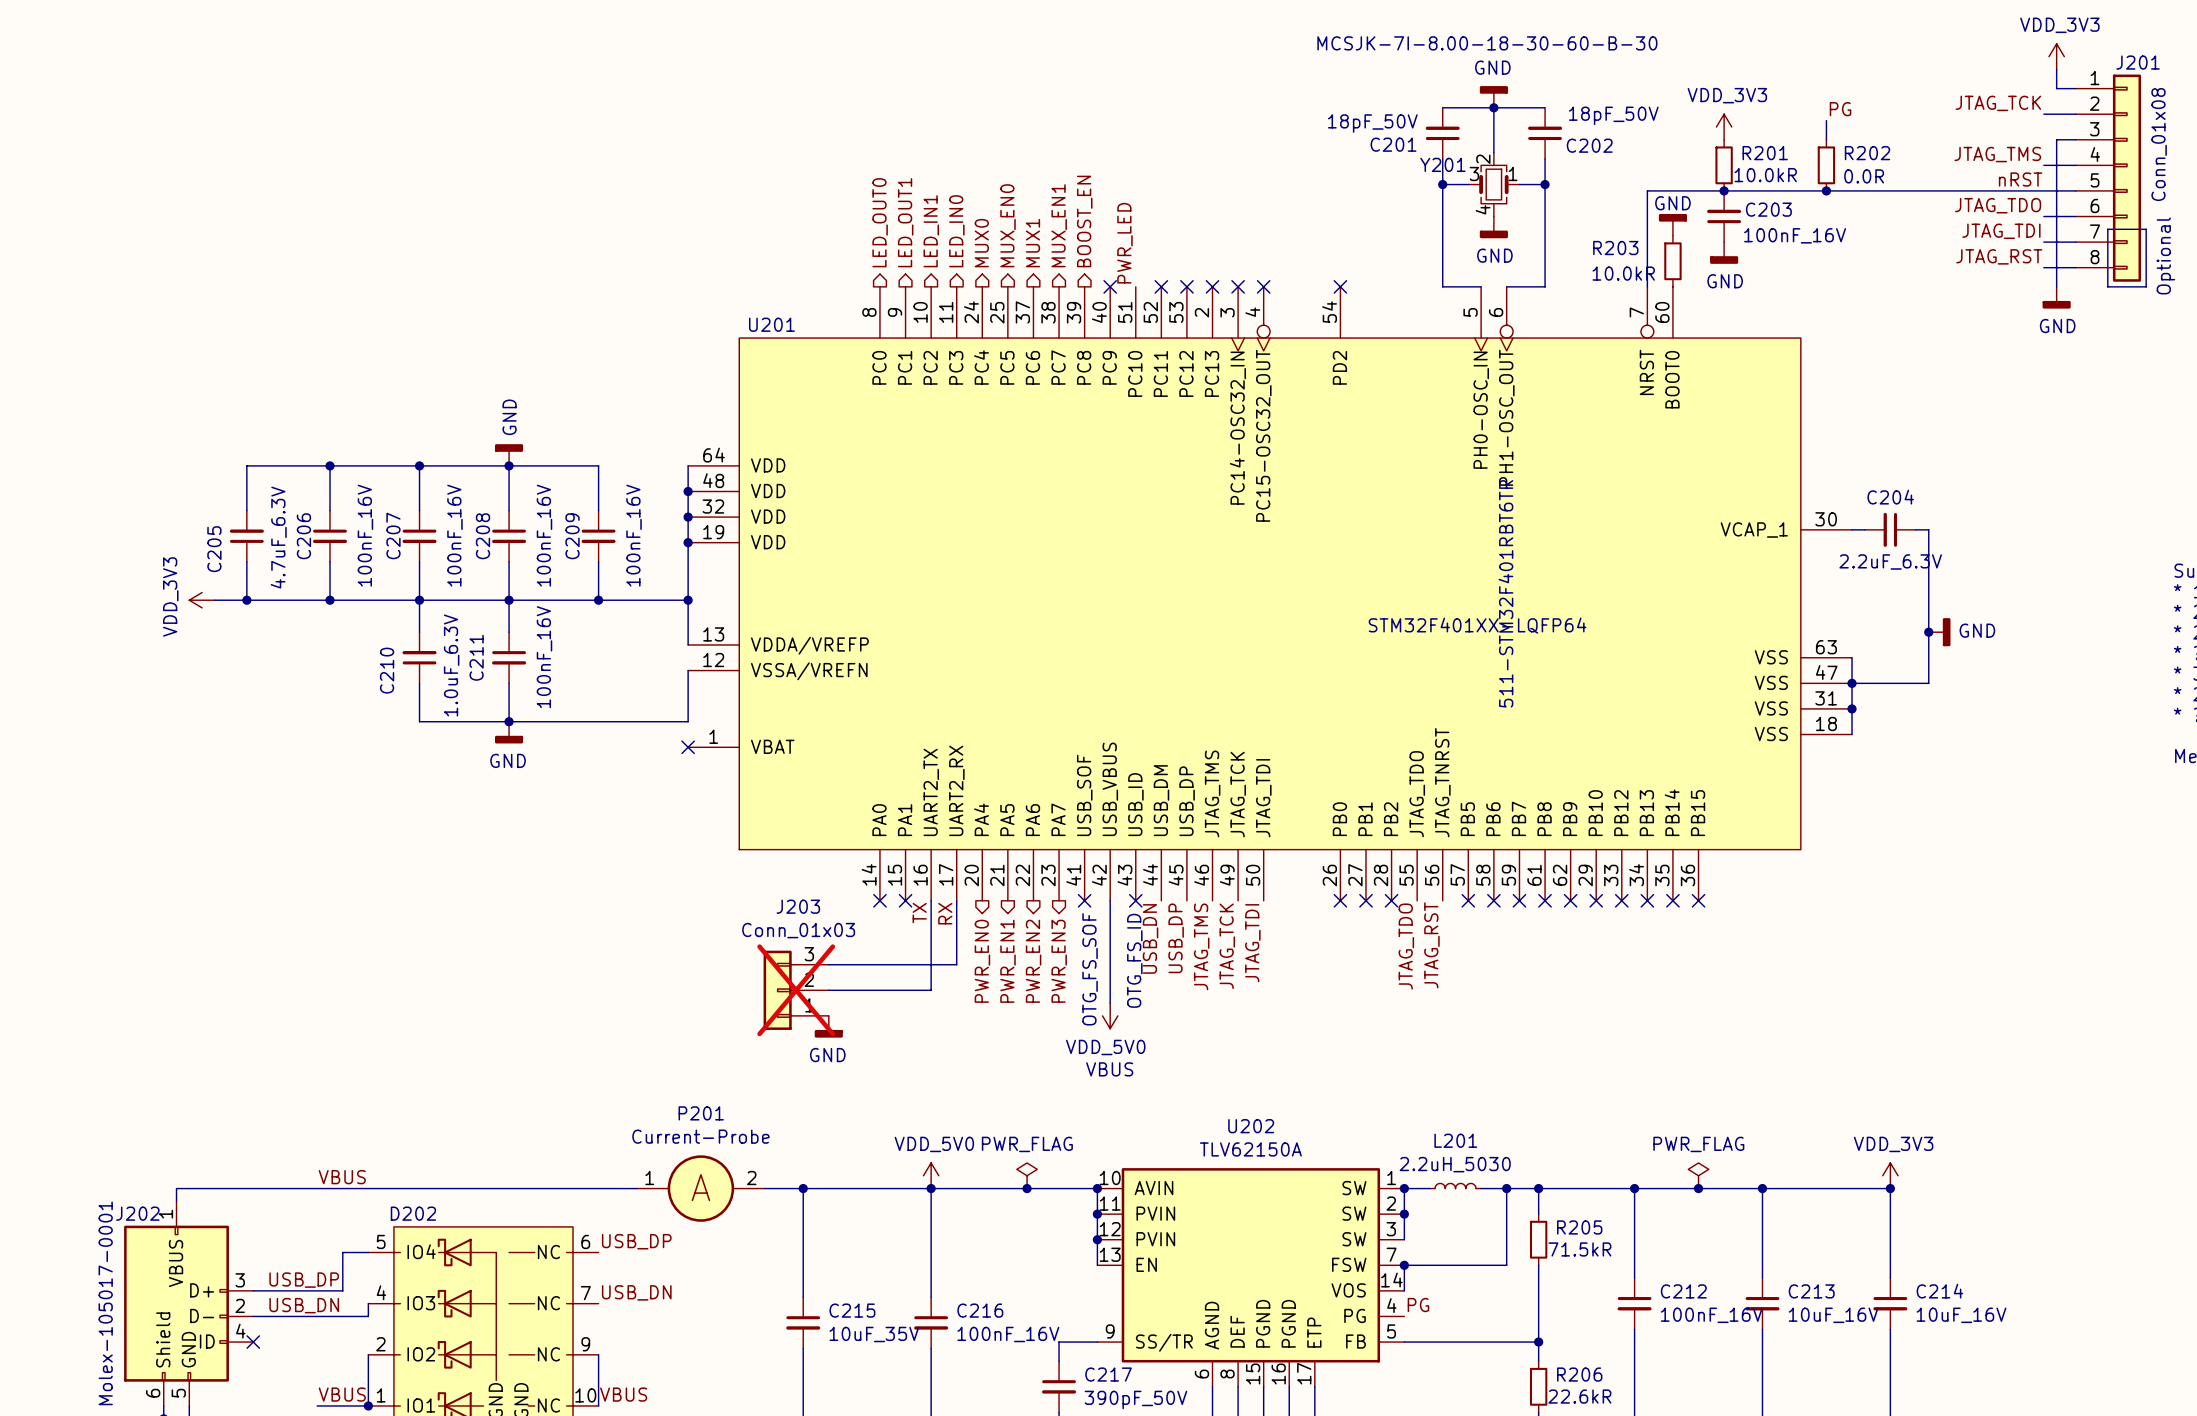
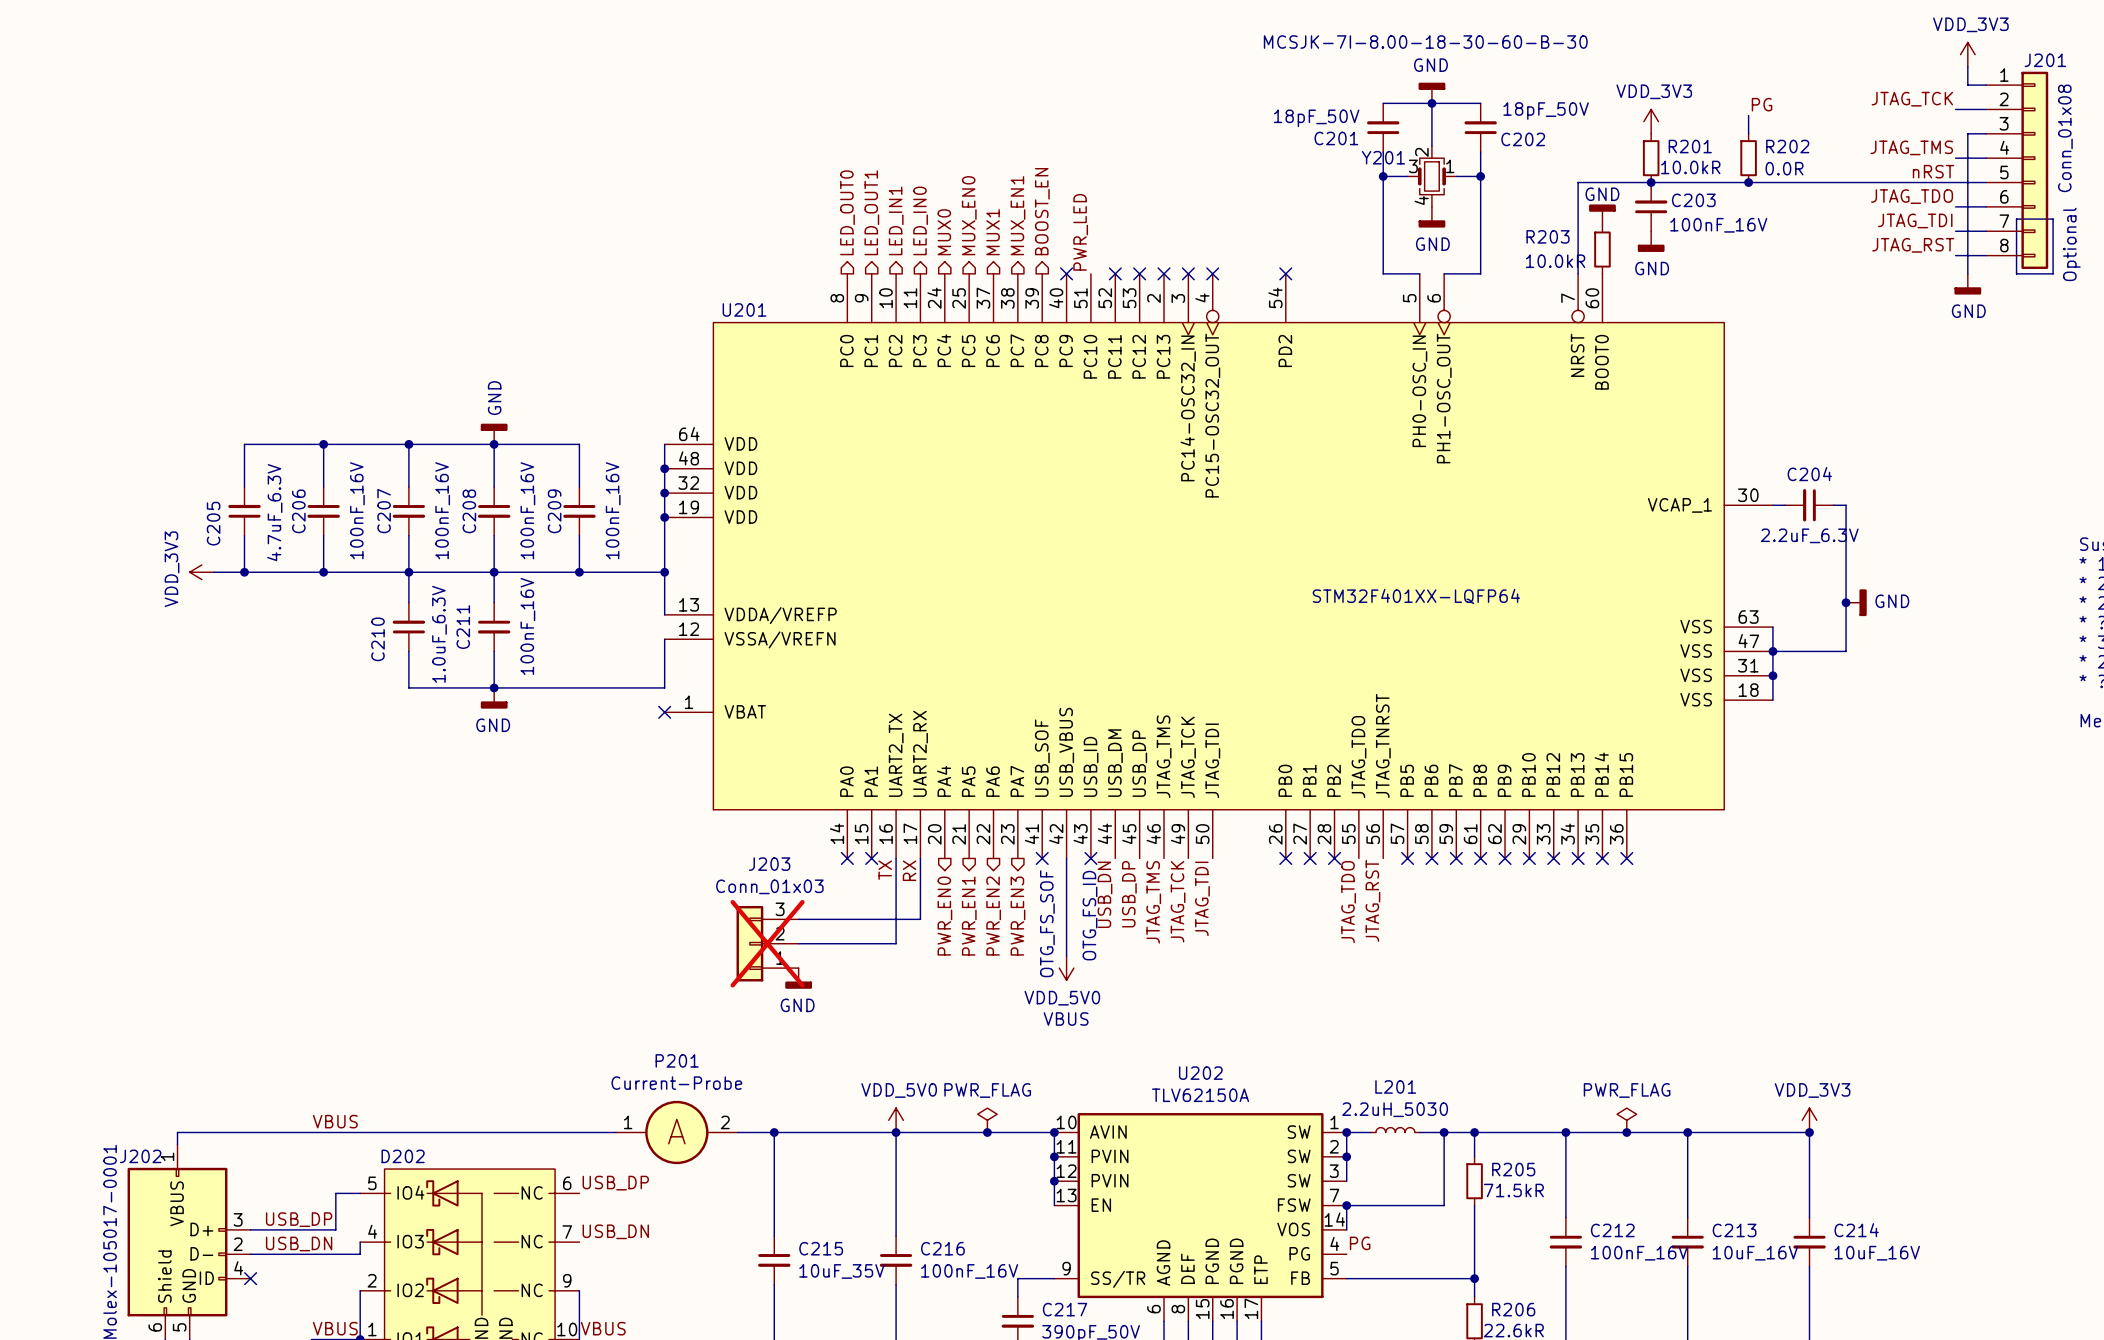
U201 text: 511-STM32F401RBT6TR (1505, 593) -> none

